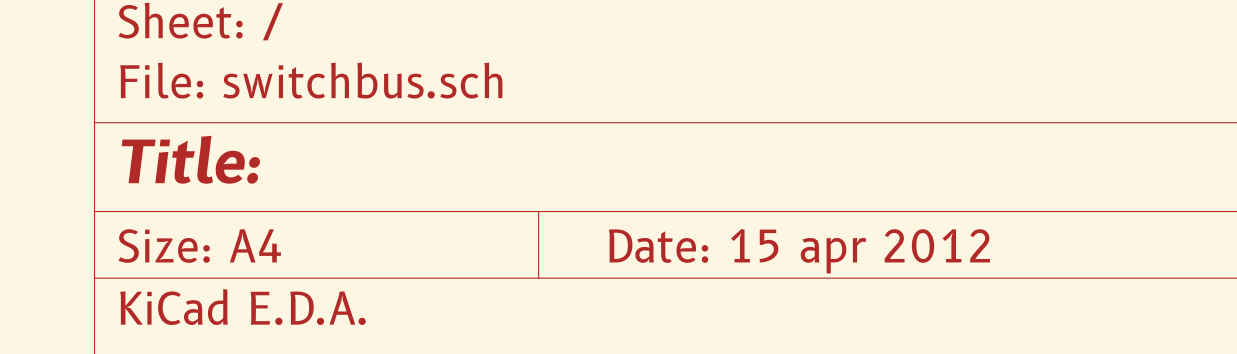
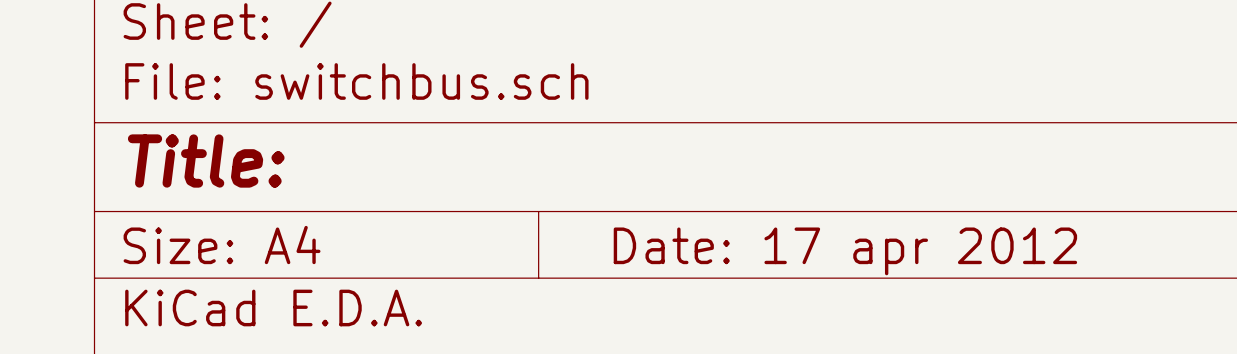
title block: Date: 15 apr 2012 (799, 251) -> Date: 17 apr 2012 (845, 251)

